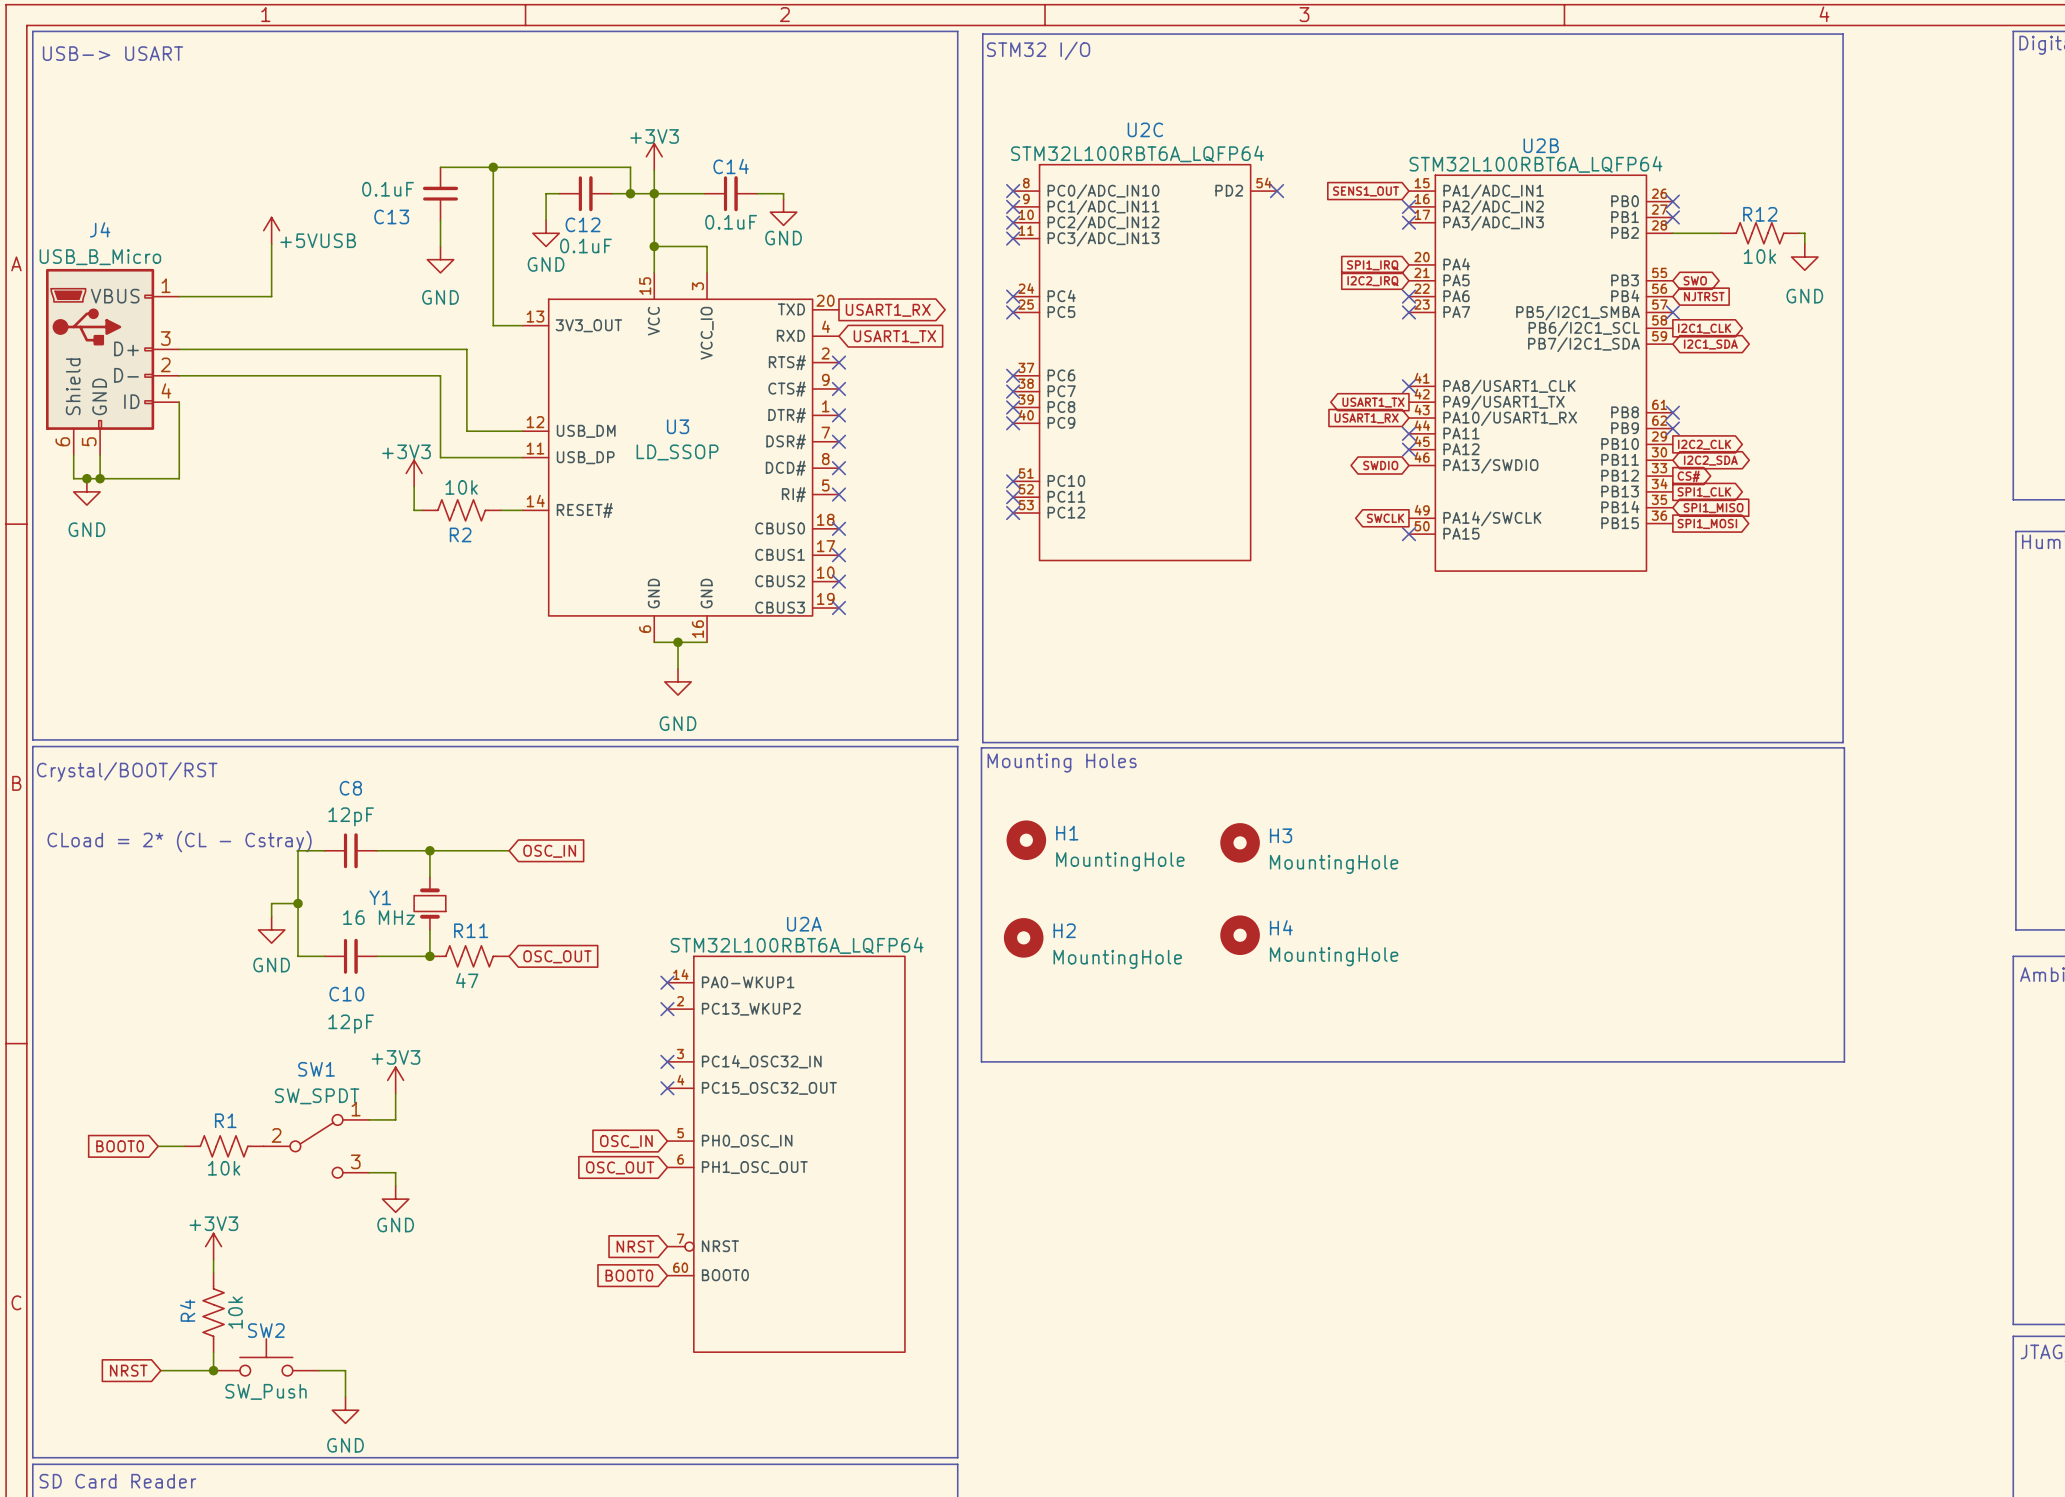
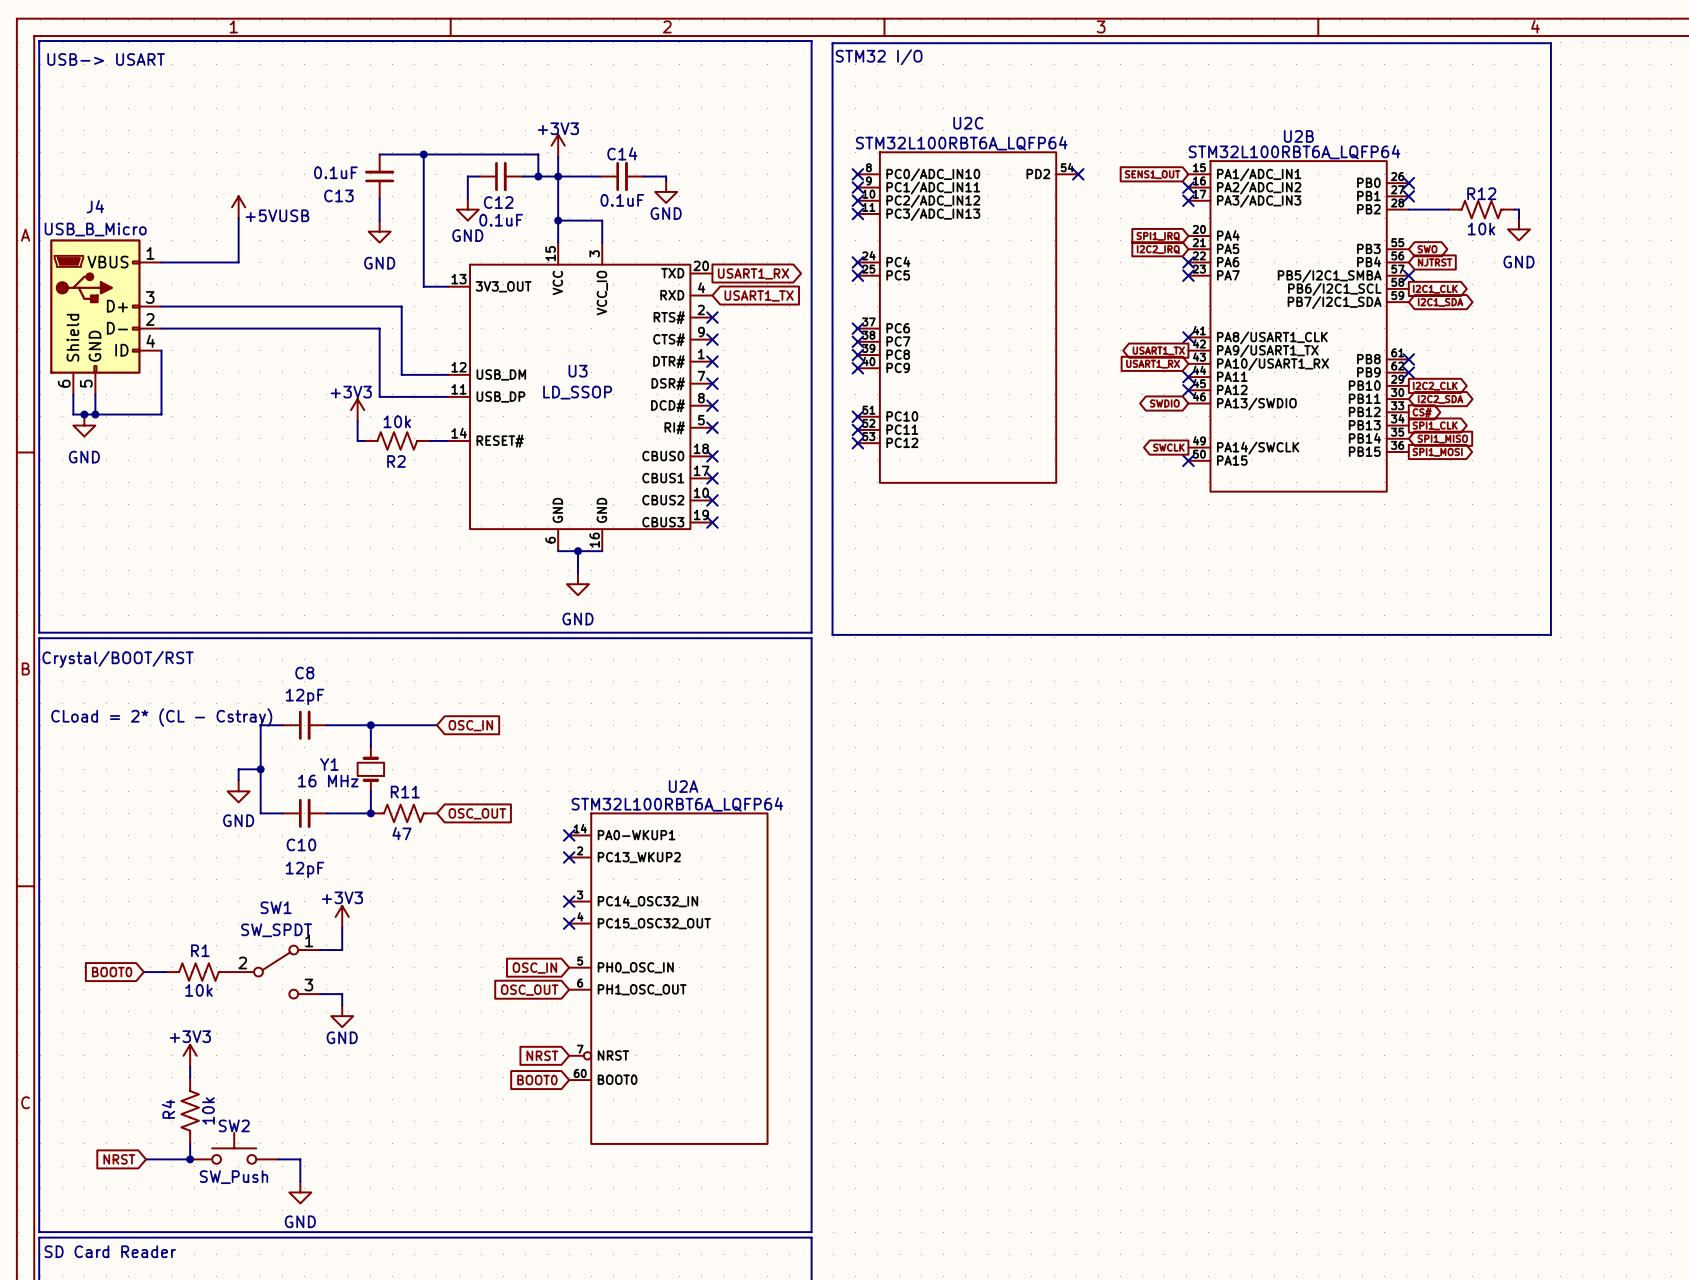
line: (981, 747) (1844, 747) (1844, 1061) (981, 1061) (981, 747) -> none
text: Mounting Holes (1062, 763) -> none
H1: MountingHole (1026, 840) -> none
H3: MountingHole (1240, 842) -> none
H4: MountingHole (1240, 935) -> none
H2: MountingHole (1023, 937) -> none

